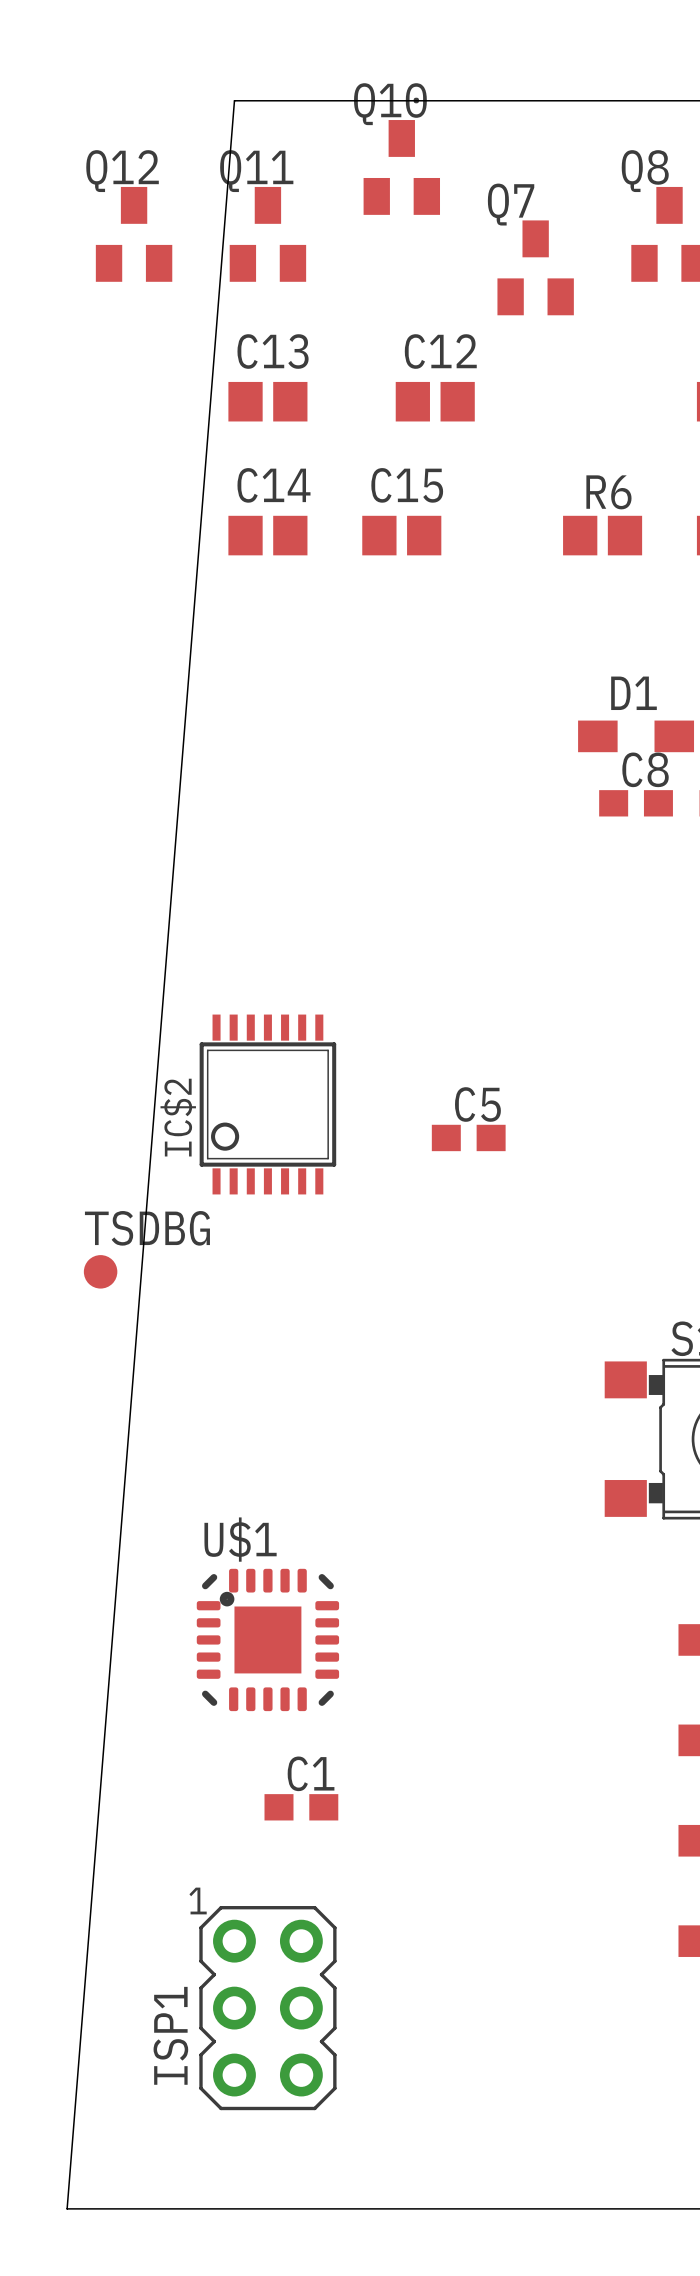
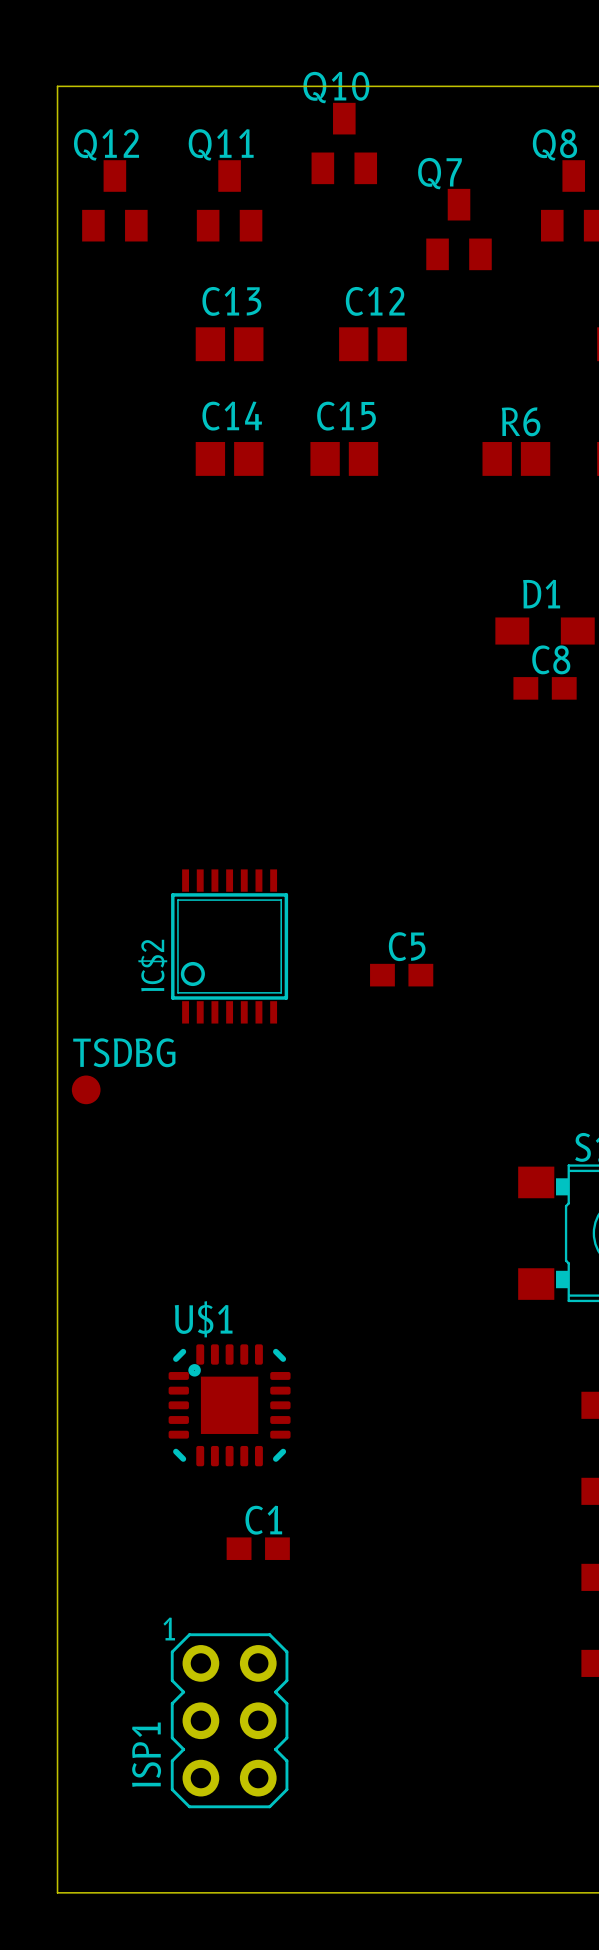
board edge: (234, 100) (67, 2208) -> (200, 86) (57, 86) (57, 1892)

